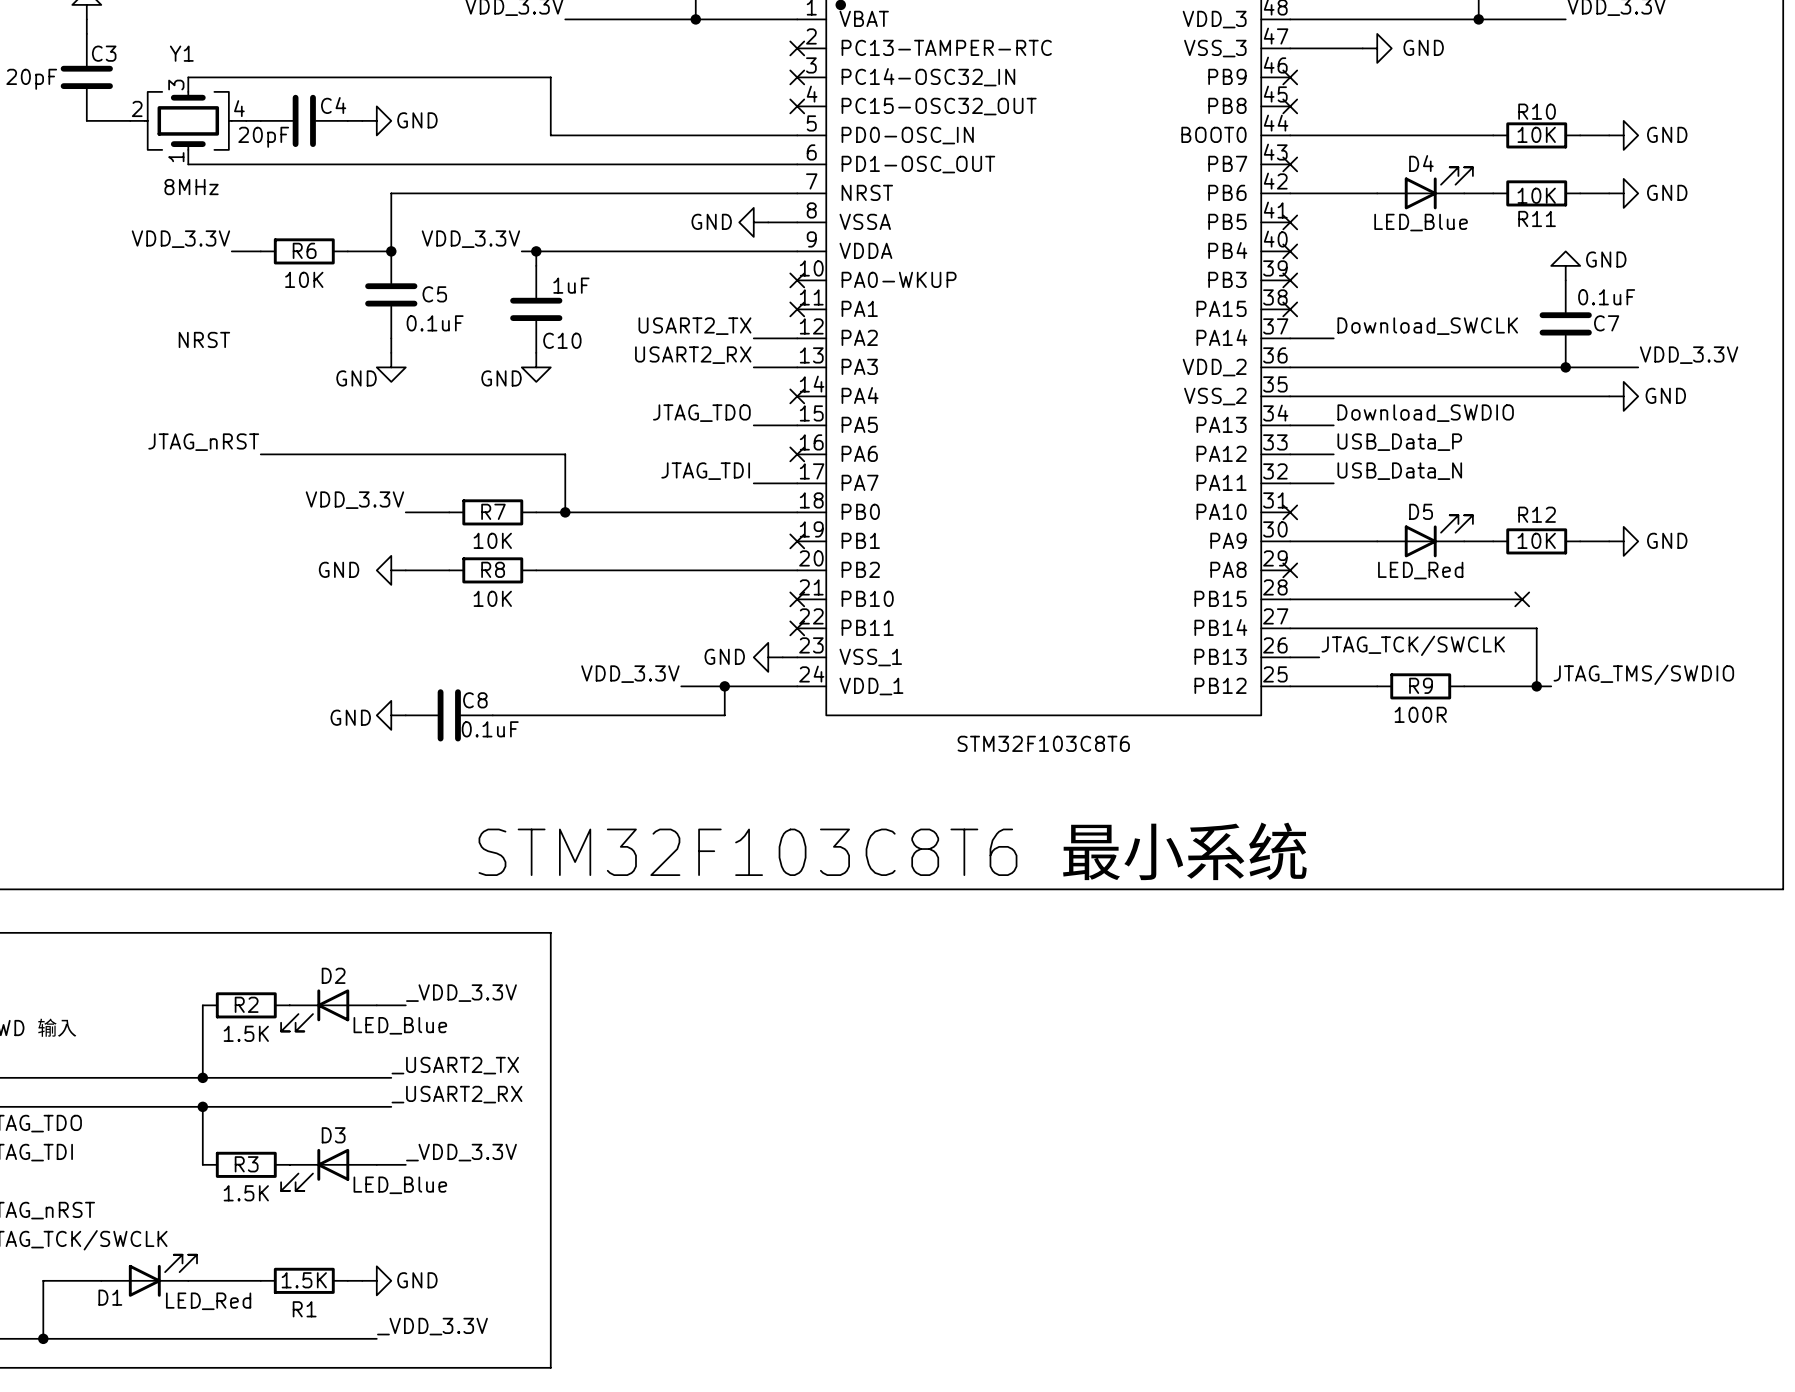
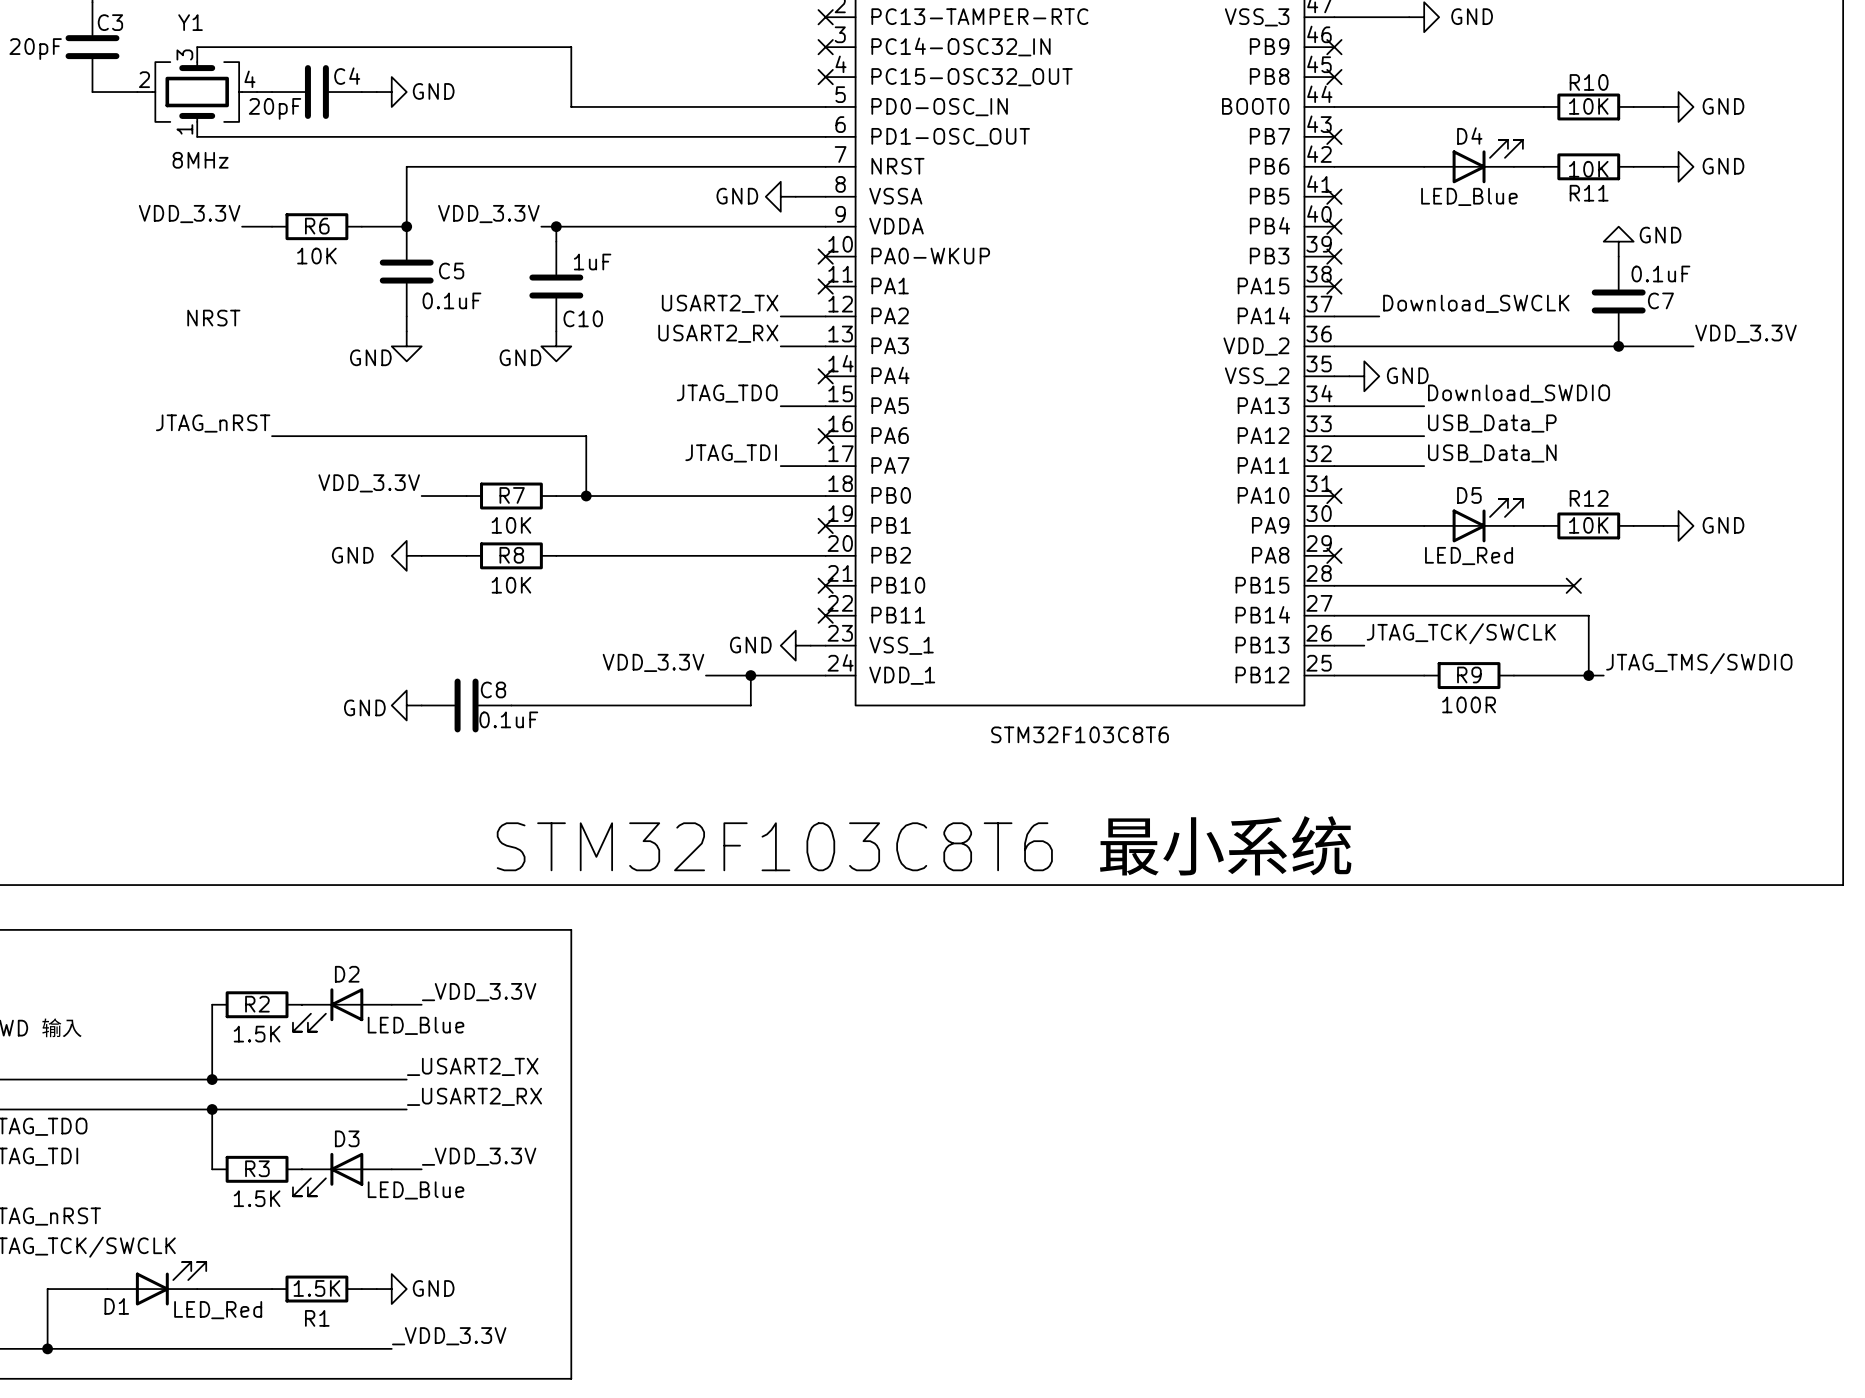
wire: (1304, 396) (1609, 396) -> none
power symbol: none -> GND (1364, 376)
power symbol: GND (1623, 396) -> none
label position: Download_SWDIO (1425, 413) -> Download_SWDIO (1519, 393)
wire: none -> (1379, 406) (1424, 406)
label position: USB_Data_P (1399, 442) -> USB_Data_P (1492, 423)
wire: none -> (1379, 436) (1424, 436)
label position: USB_Data_N (1399, 471) -> USB_Data_N (1492, 453)
wire: none -> (1379, 466) (1424, 466)

